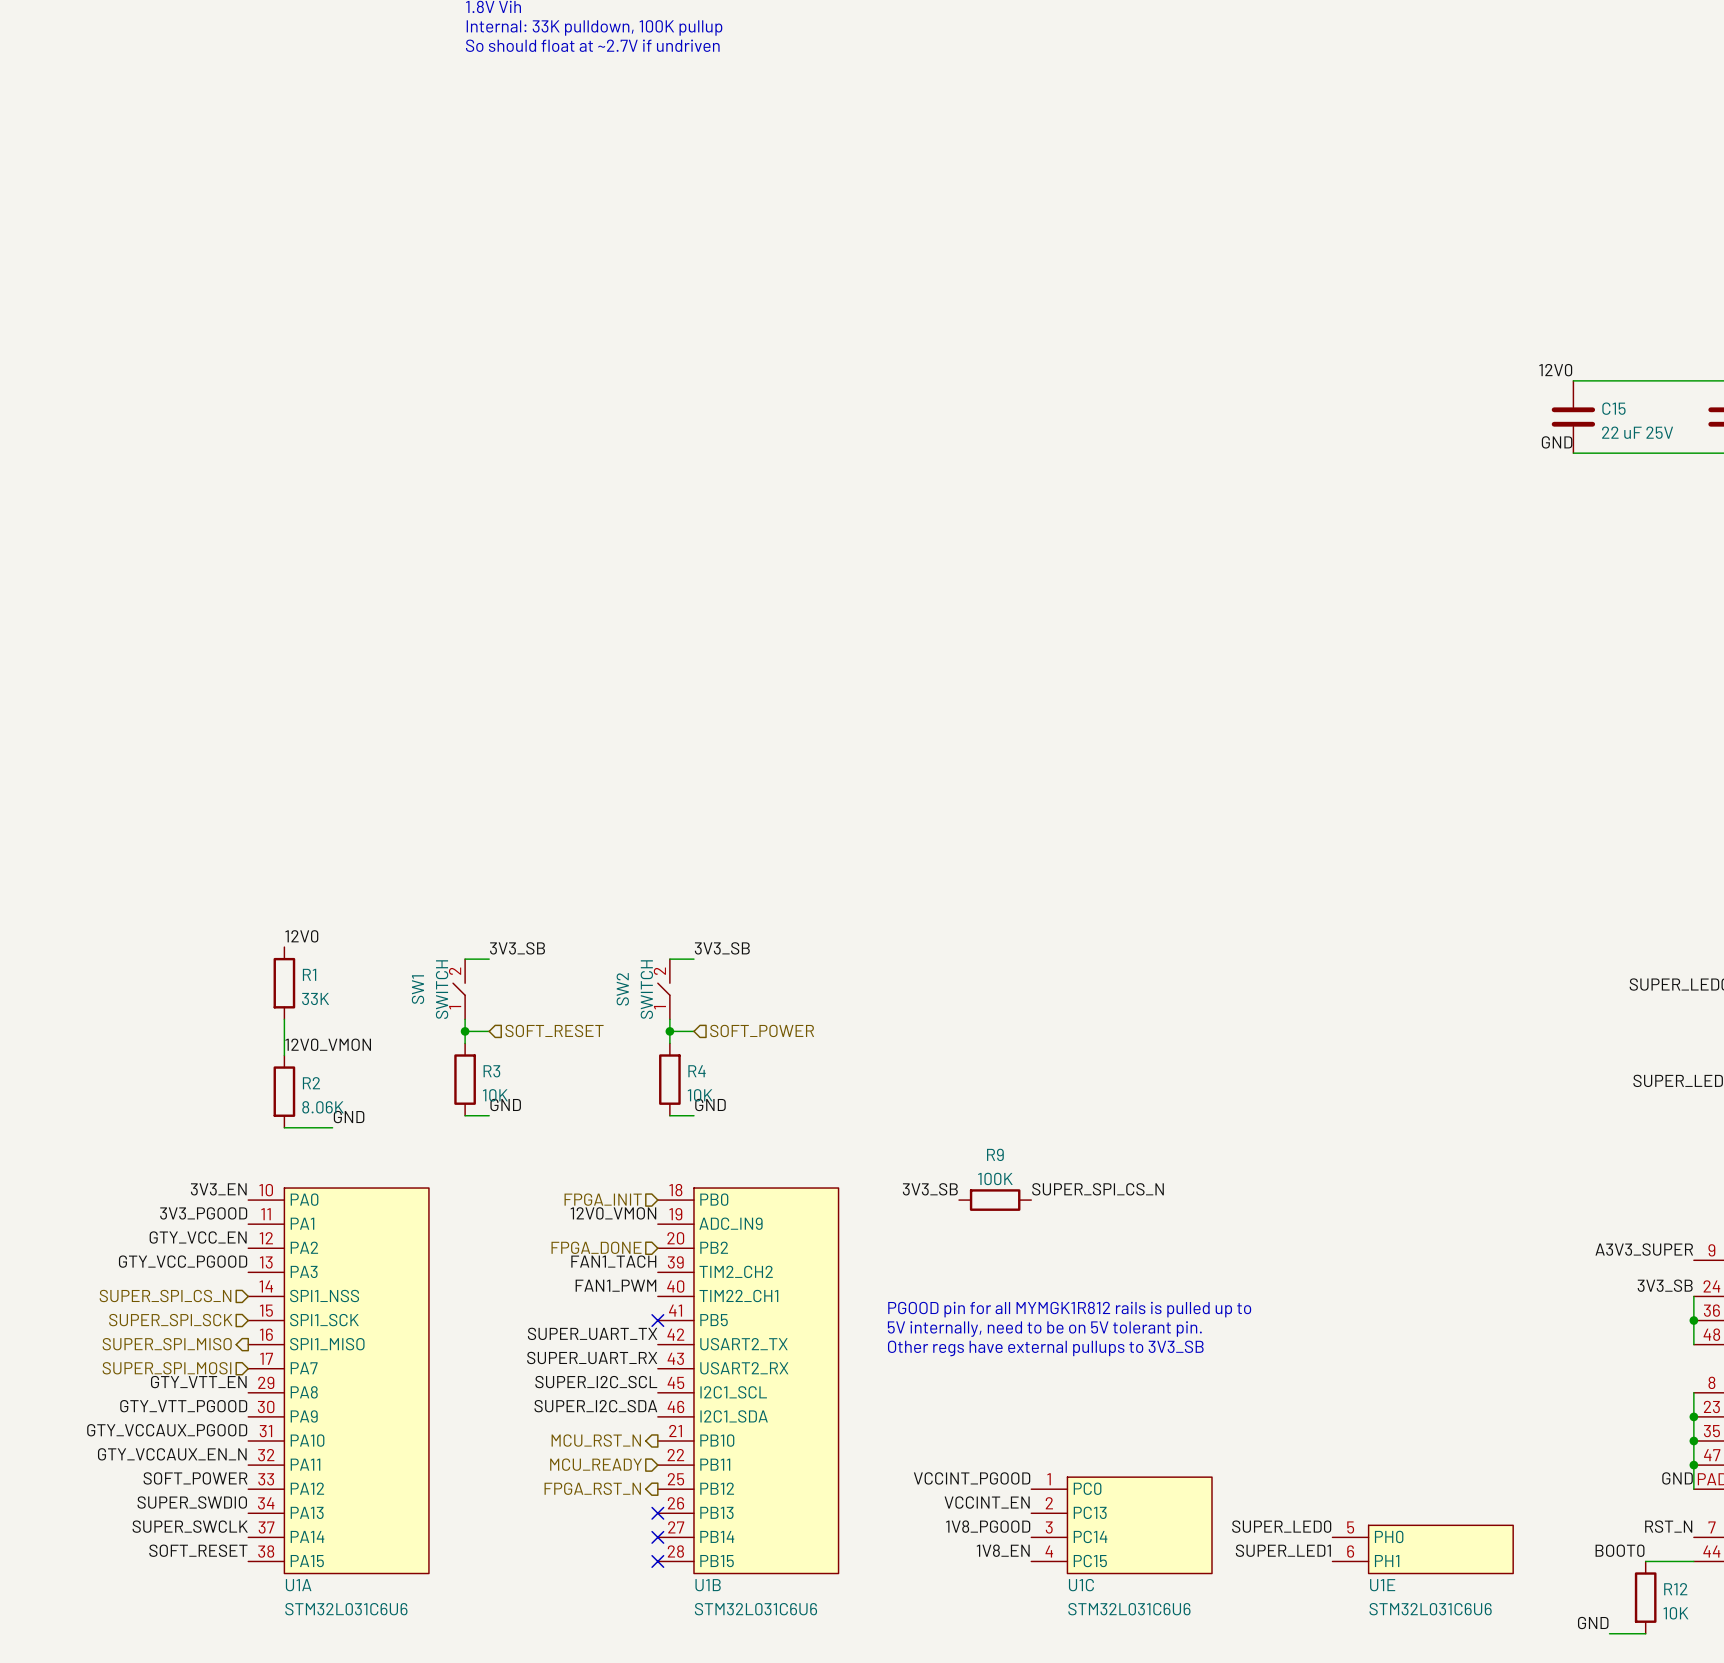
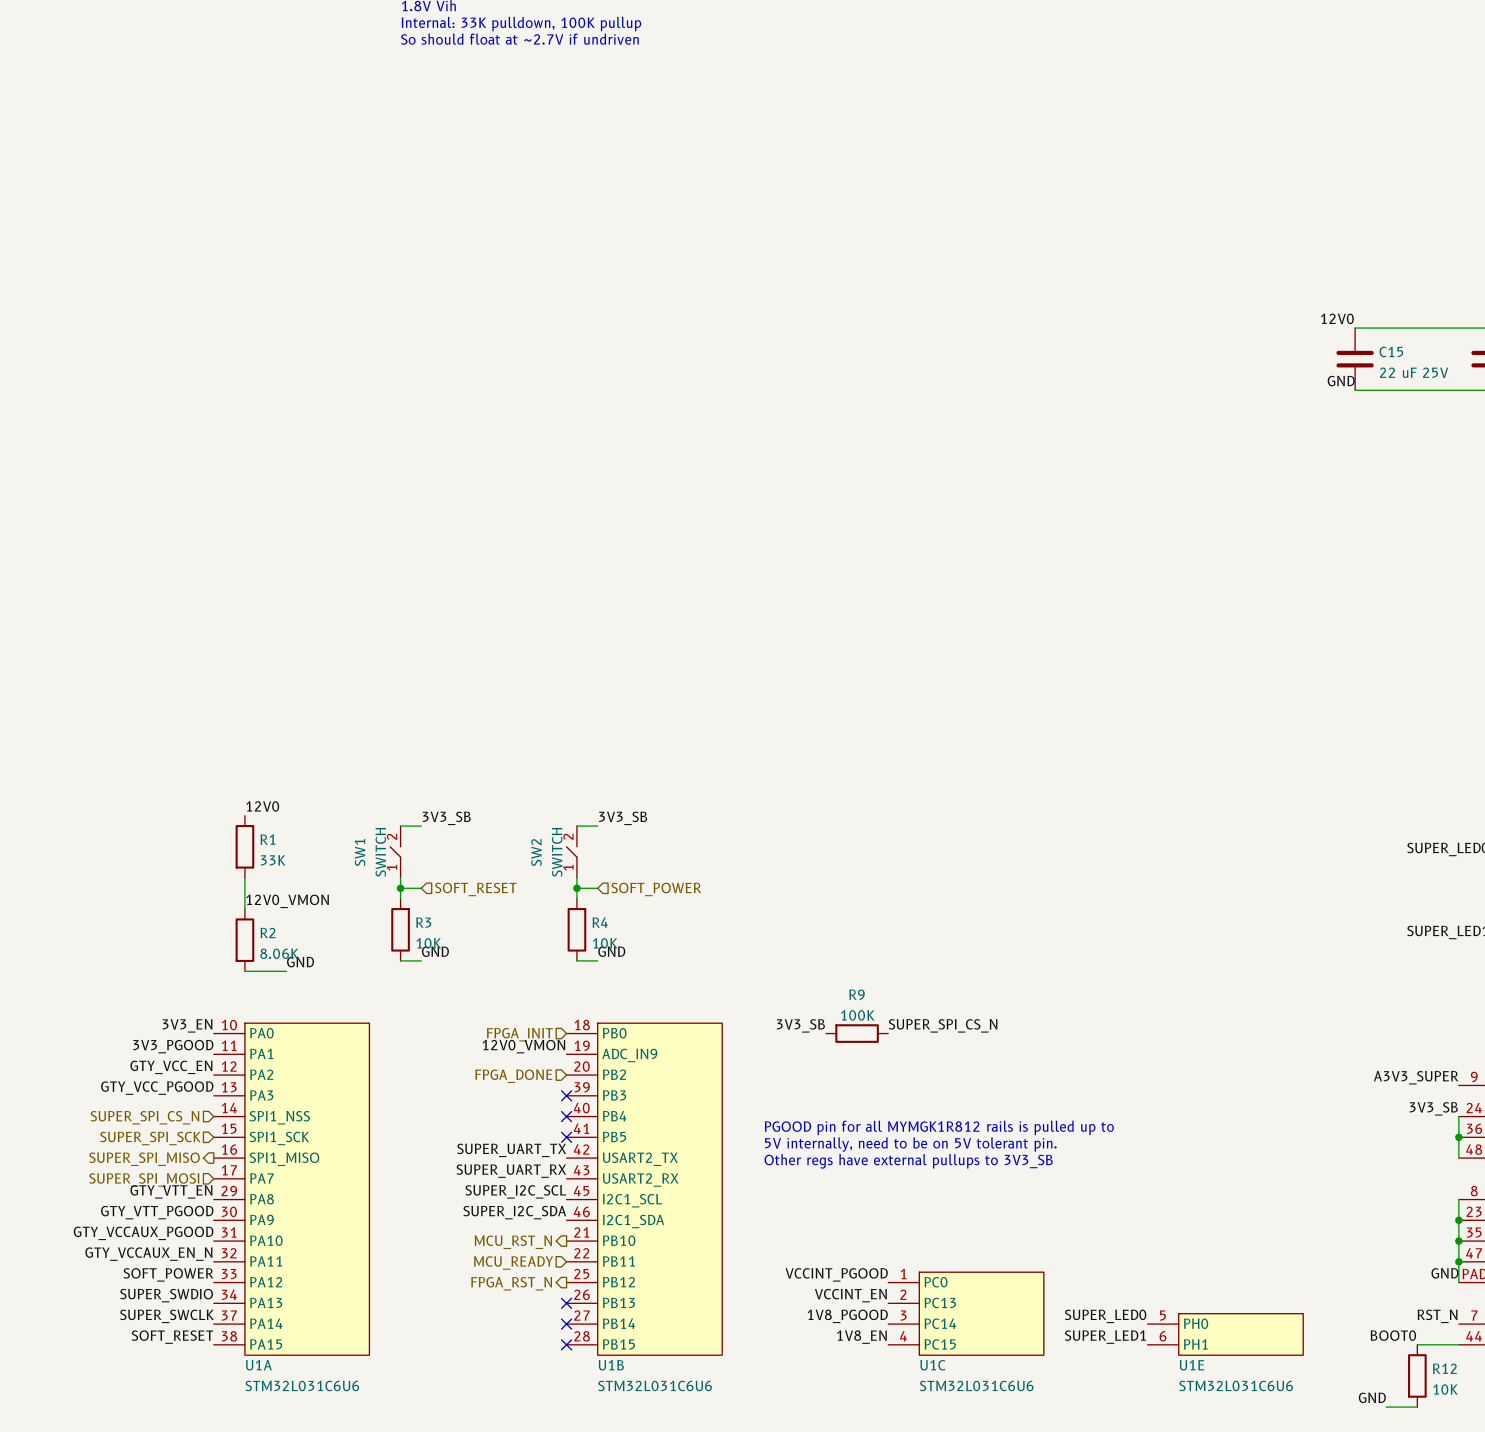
label: FAN1_TACH (613, 1261) -> none
U1B pin name: TIM2_CH2 (736, 1271) -> PB3 (614, 1095)
no-connect mark: none -> (566, 1095)
label: FAN1_PWM (615, 1285) -> none
no-connect mark: none -> (566, 1116)
U1B pin name: TIM22_CH1 (738, 1296) -> PB4 (614, 1116)

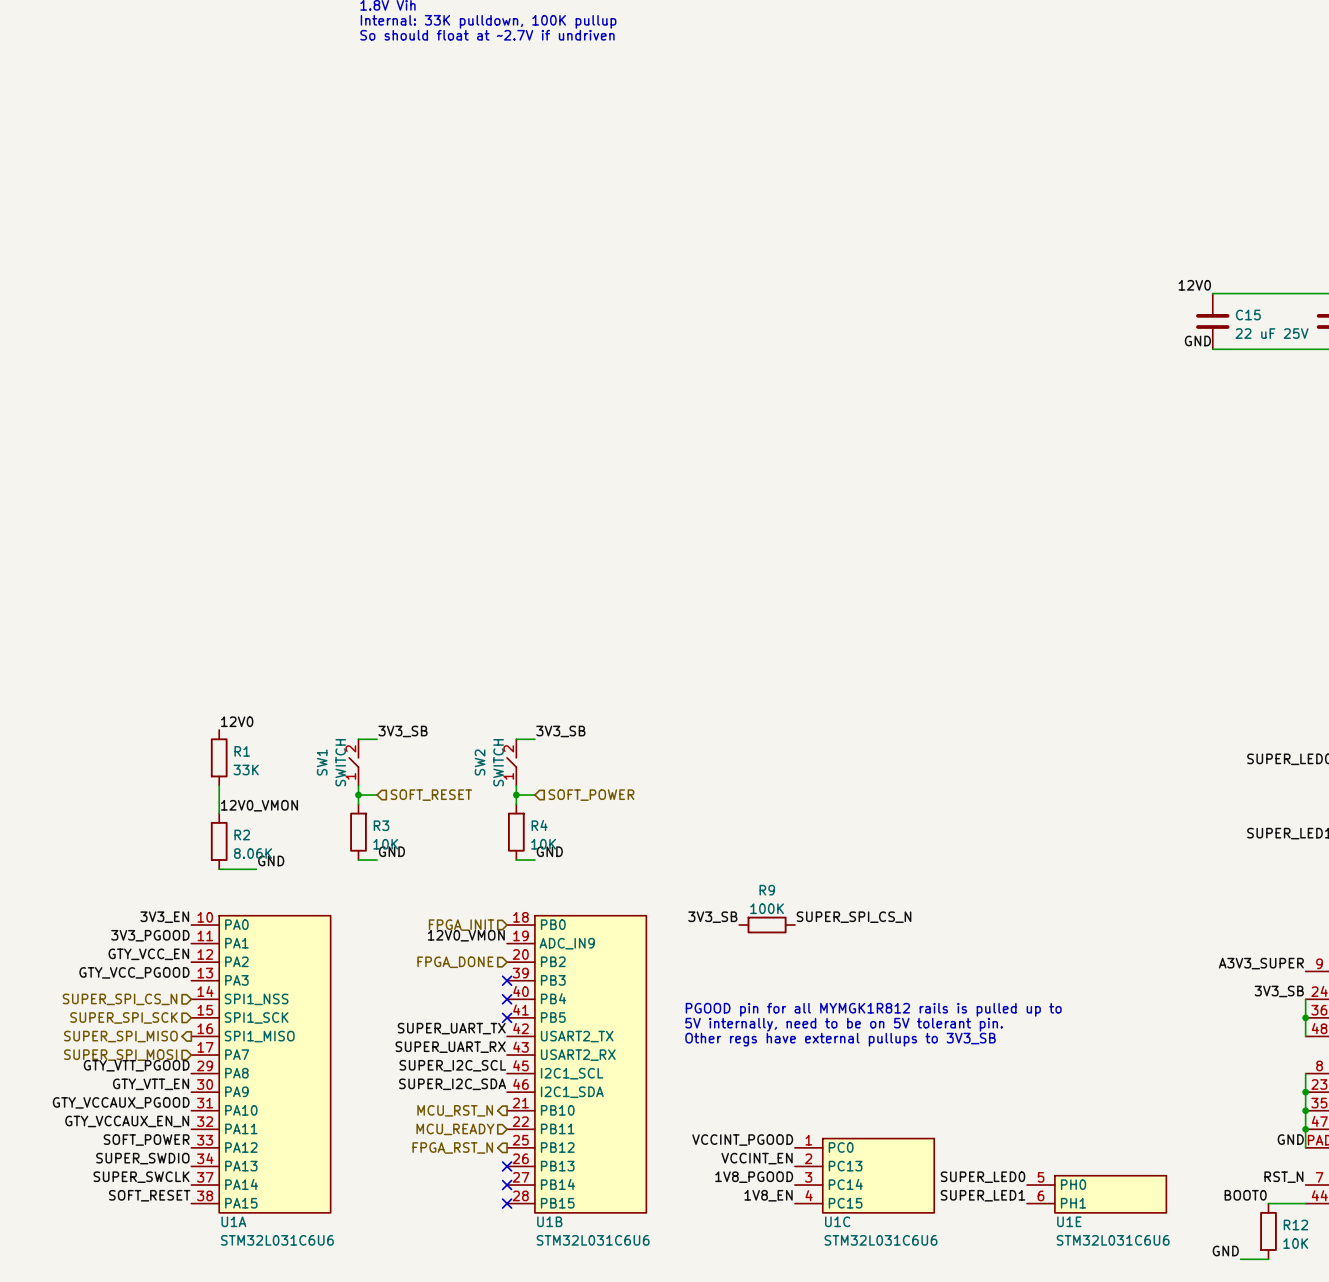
label: GTY_VTT_EN (171, 1191) -> GTY_VTT_PGOOD (136, 1065)
label: GTY_VTT_PGOOD (157, 1212) -> GTY_VTT_EN (151, 1084)

